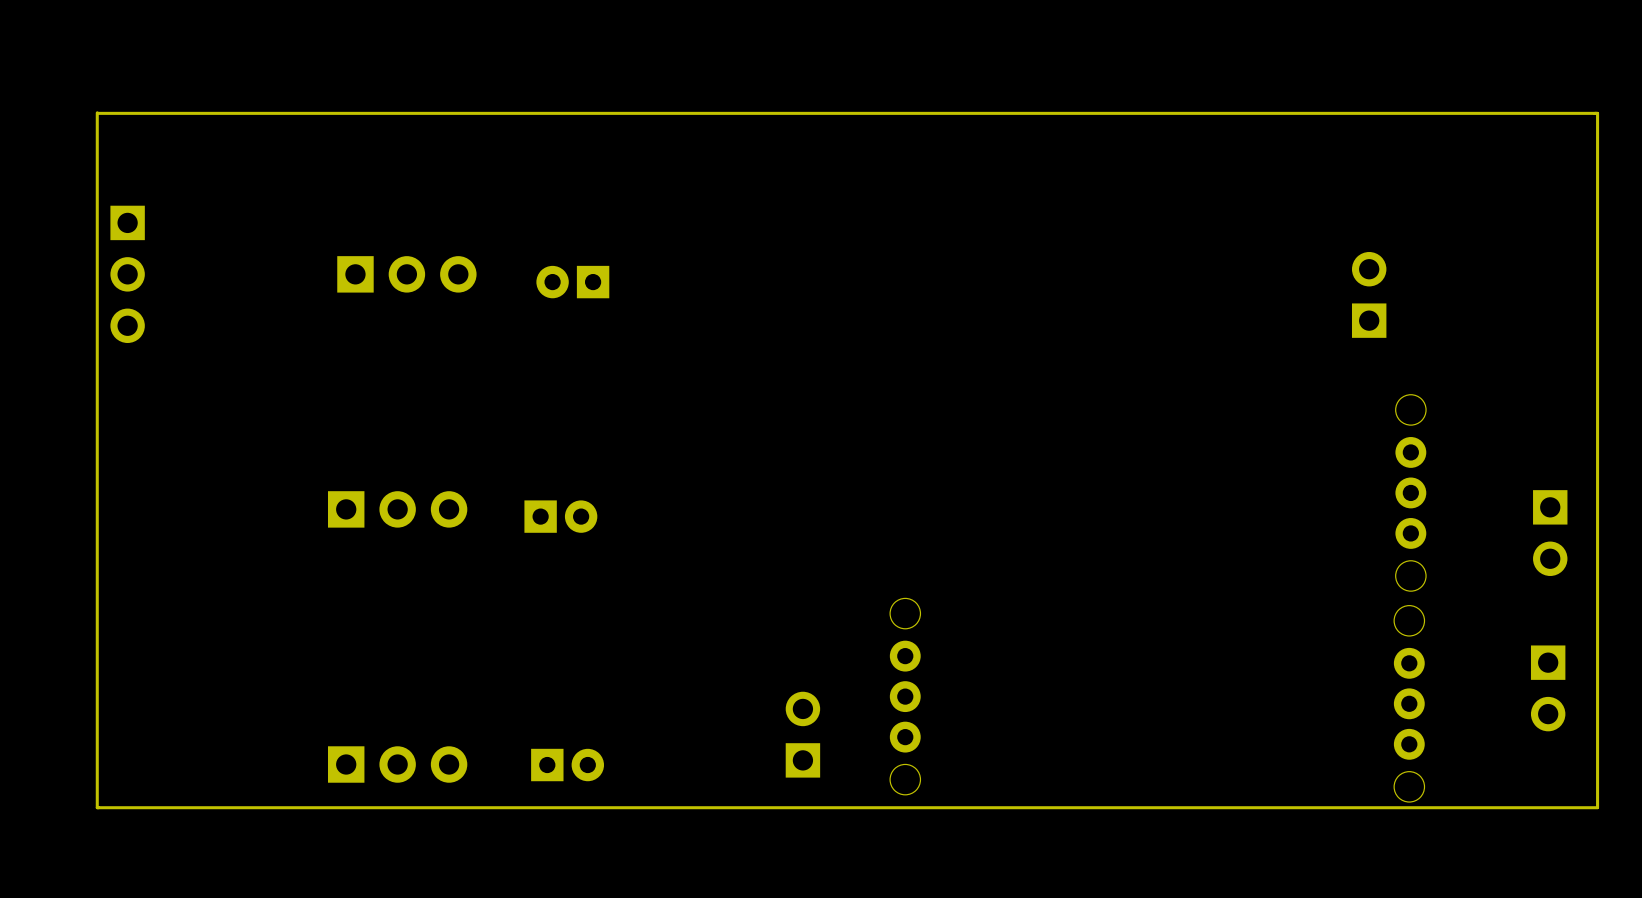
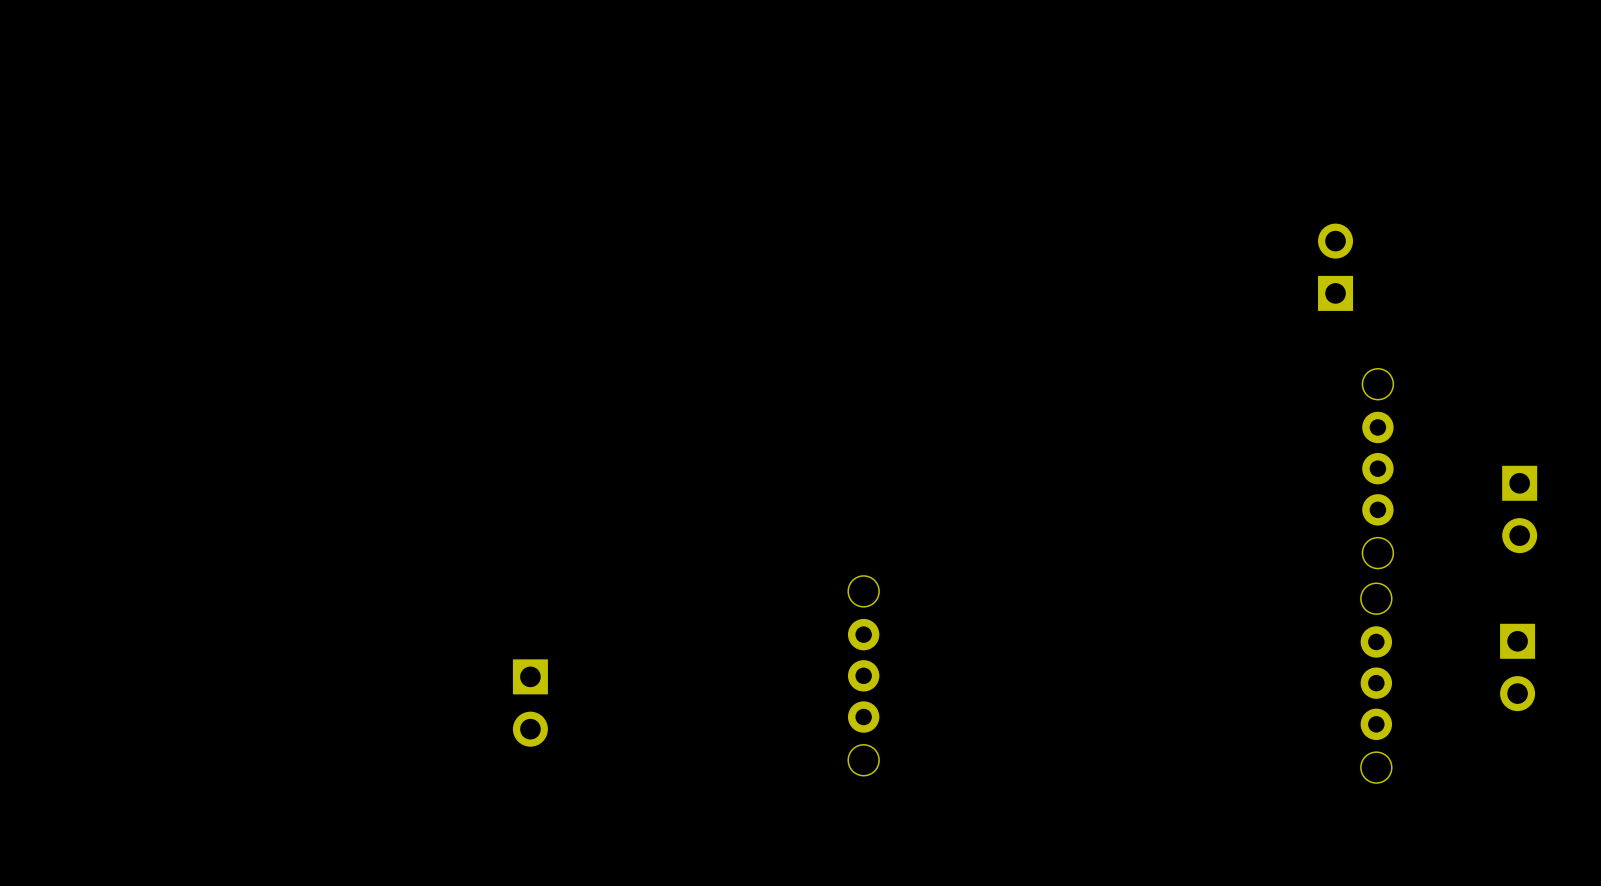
board edge: (97, 112) (97, 807) (98, 807) -> none
board edge: (97, 113) (1597, 113) (1597, 807) -> none
part: (127, 274) -> none
part: (406, 274) -> none
part: (572, 282) -> none
part: (397, 509) -> none
part: (560, 516) -> none
part rotation: 0° (802, 734) -> 180° (530, 703)
part position: (802, 734) -> (530, 703)
part: (397, 764) -> none
part: (567, 765) -> none
board edge: (1597, 807) (99, 807) -> none

